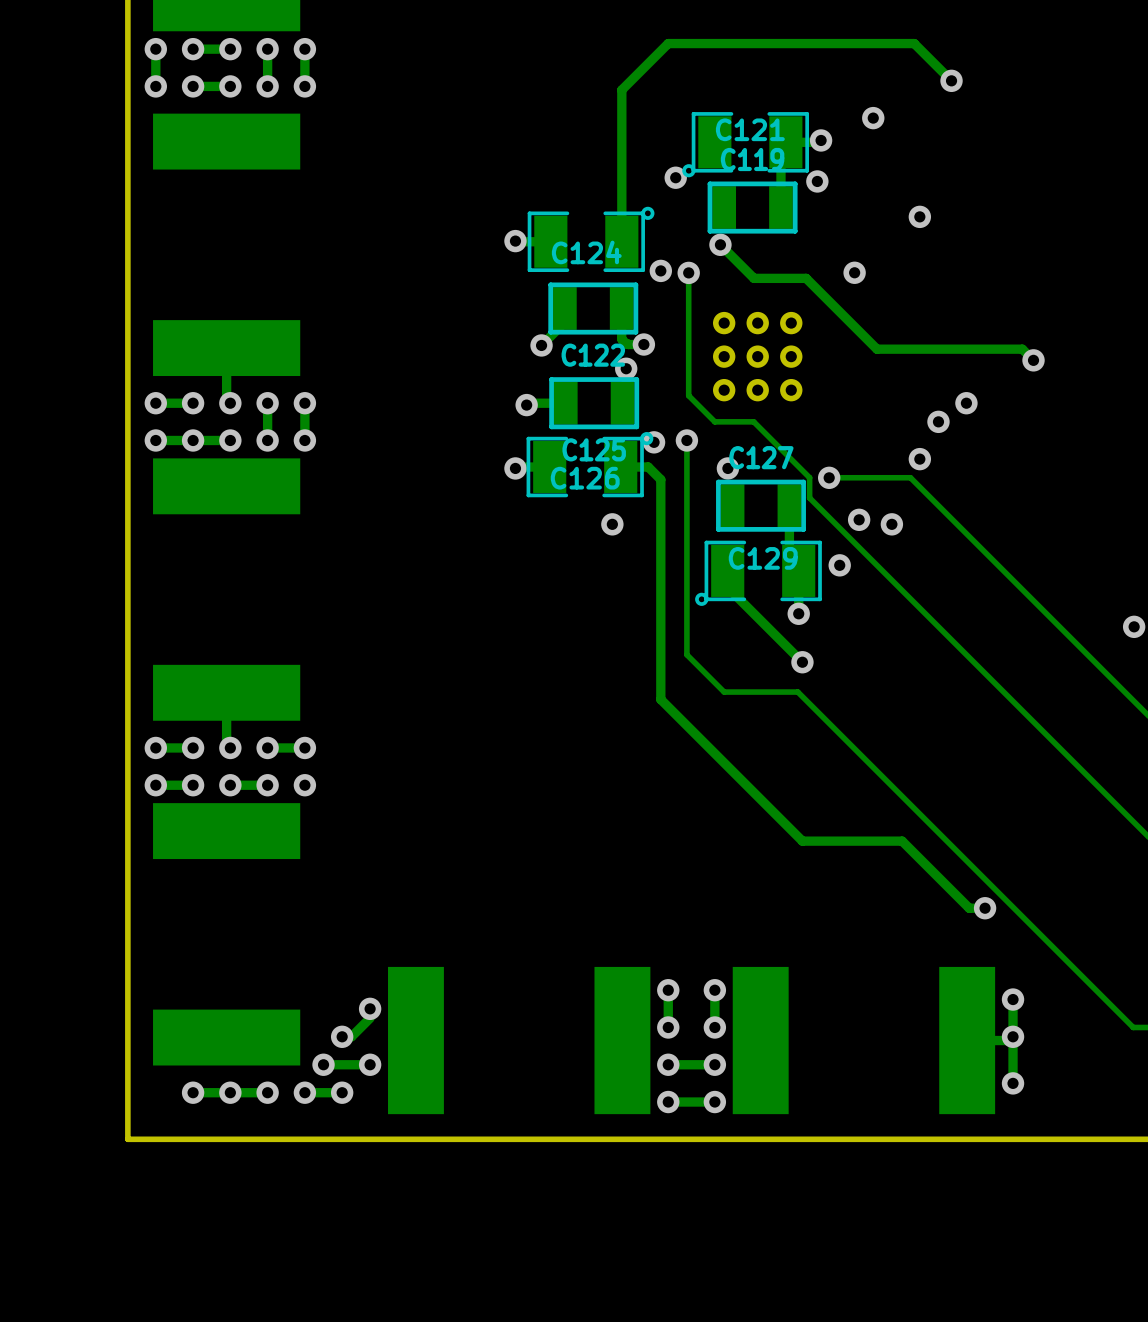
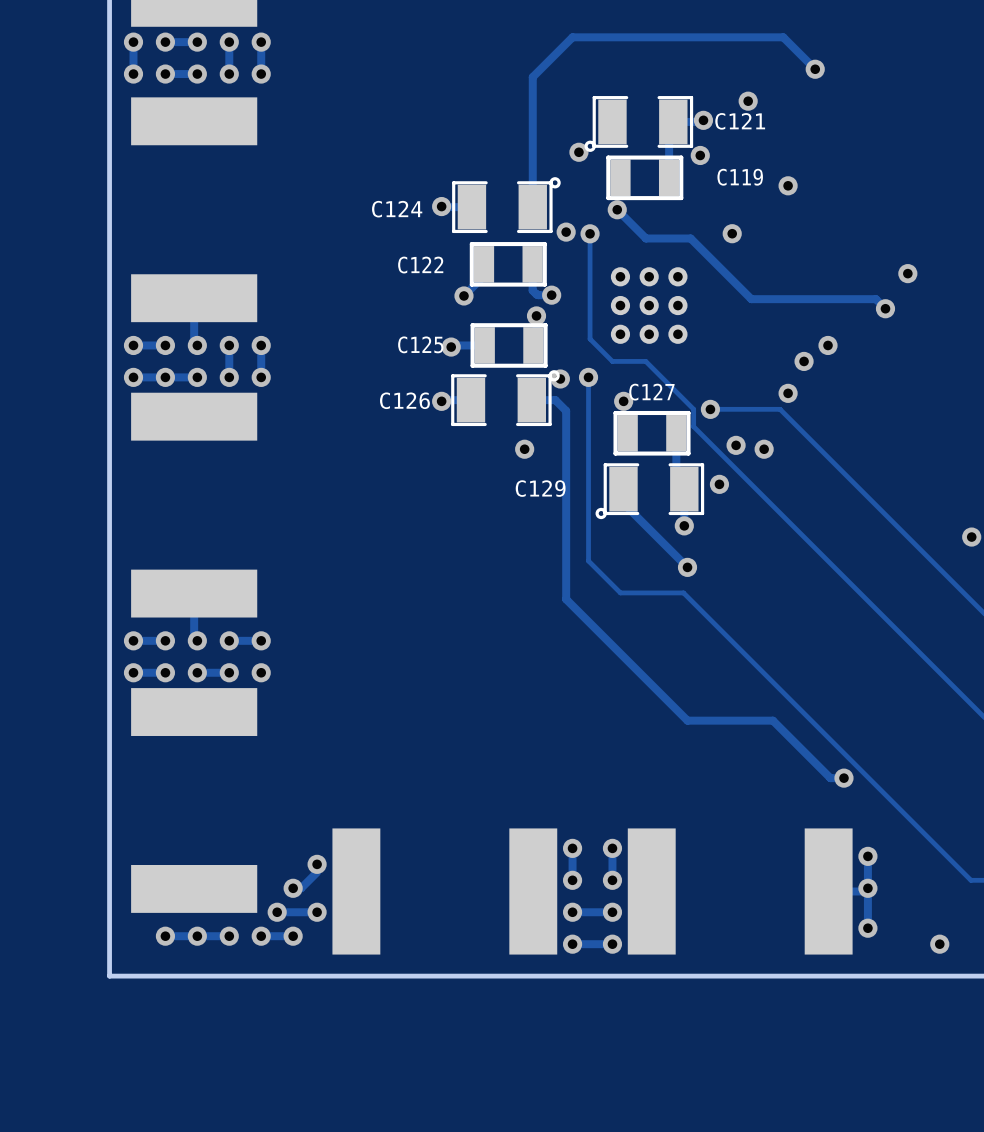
C121 name position: C121 (750, 129) -> C121 (740, 121)
C119 name position: C119 (752, 159) -> C119 (740, 177)
C124 name position: C124 (586, 252) -> C124 (397, 209)
via: none -> (907, 273)
C122 name position: C122 (593, 355) -> C122 (420, 265)
C125 name position: C125 (594, 449) -> C125 (420, 344)
C126 name position: C126 (585, 478) -> C126 (404, 400)
C129 name position: C129 (763, 558) -> C129 (540, 488)
via: none -> (939, 944)

